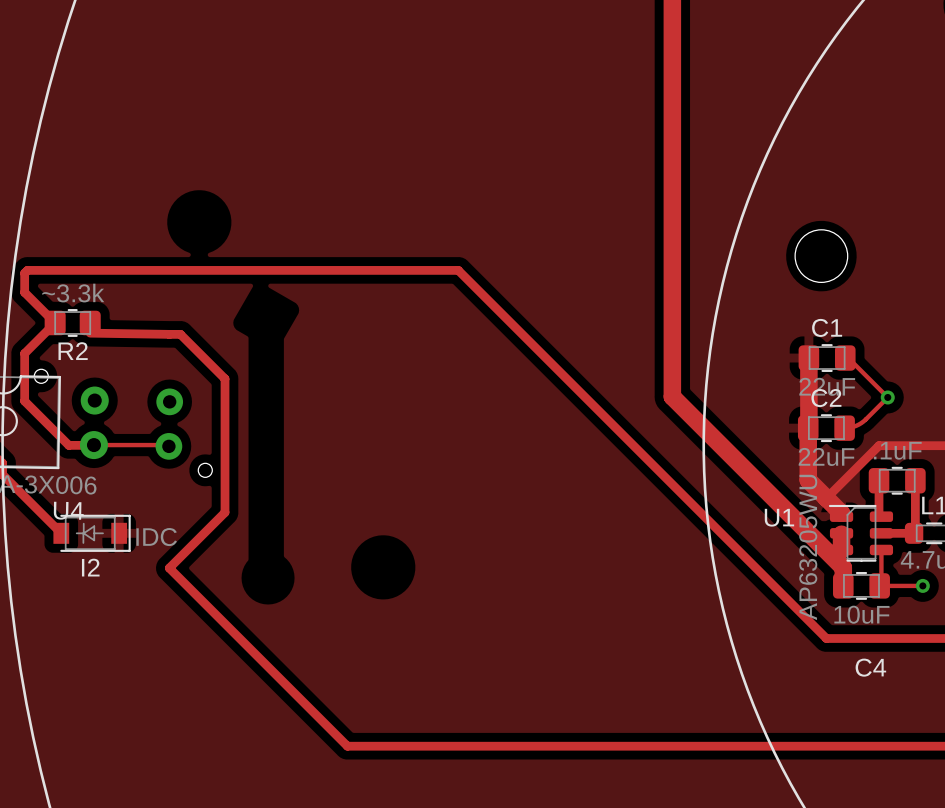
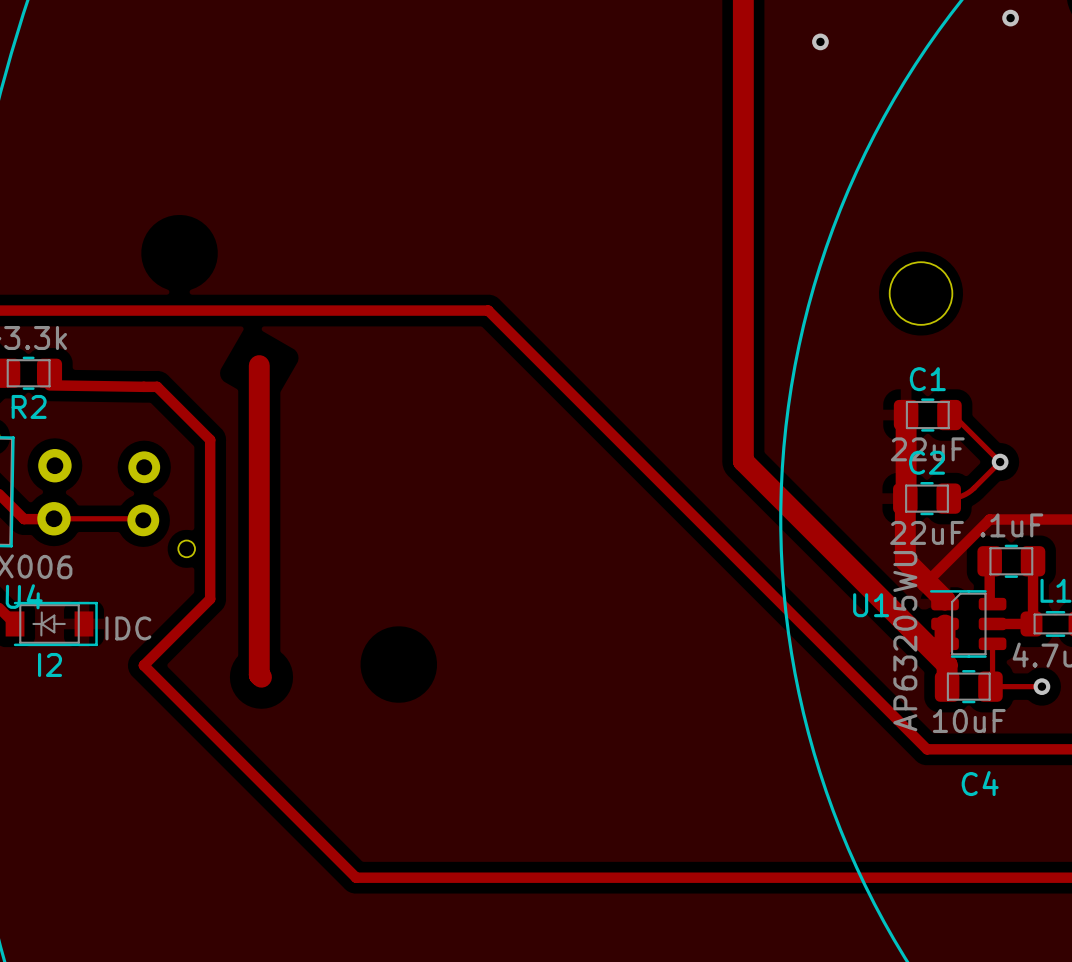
via: none -> (1010, 18)
via: none -> (820, 41)
track: none -> (259, 365) (259, 675) (261, 677)

